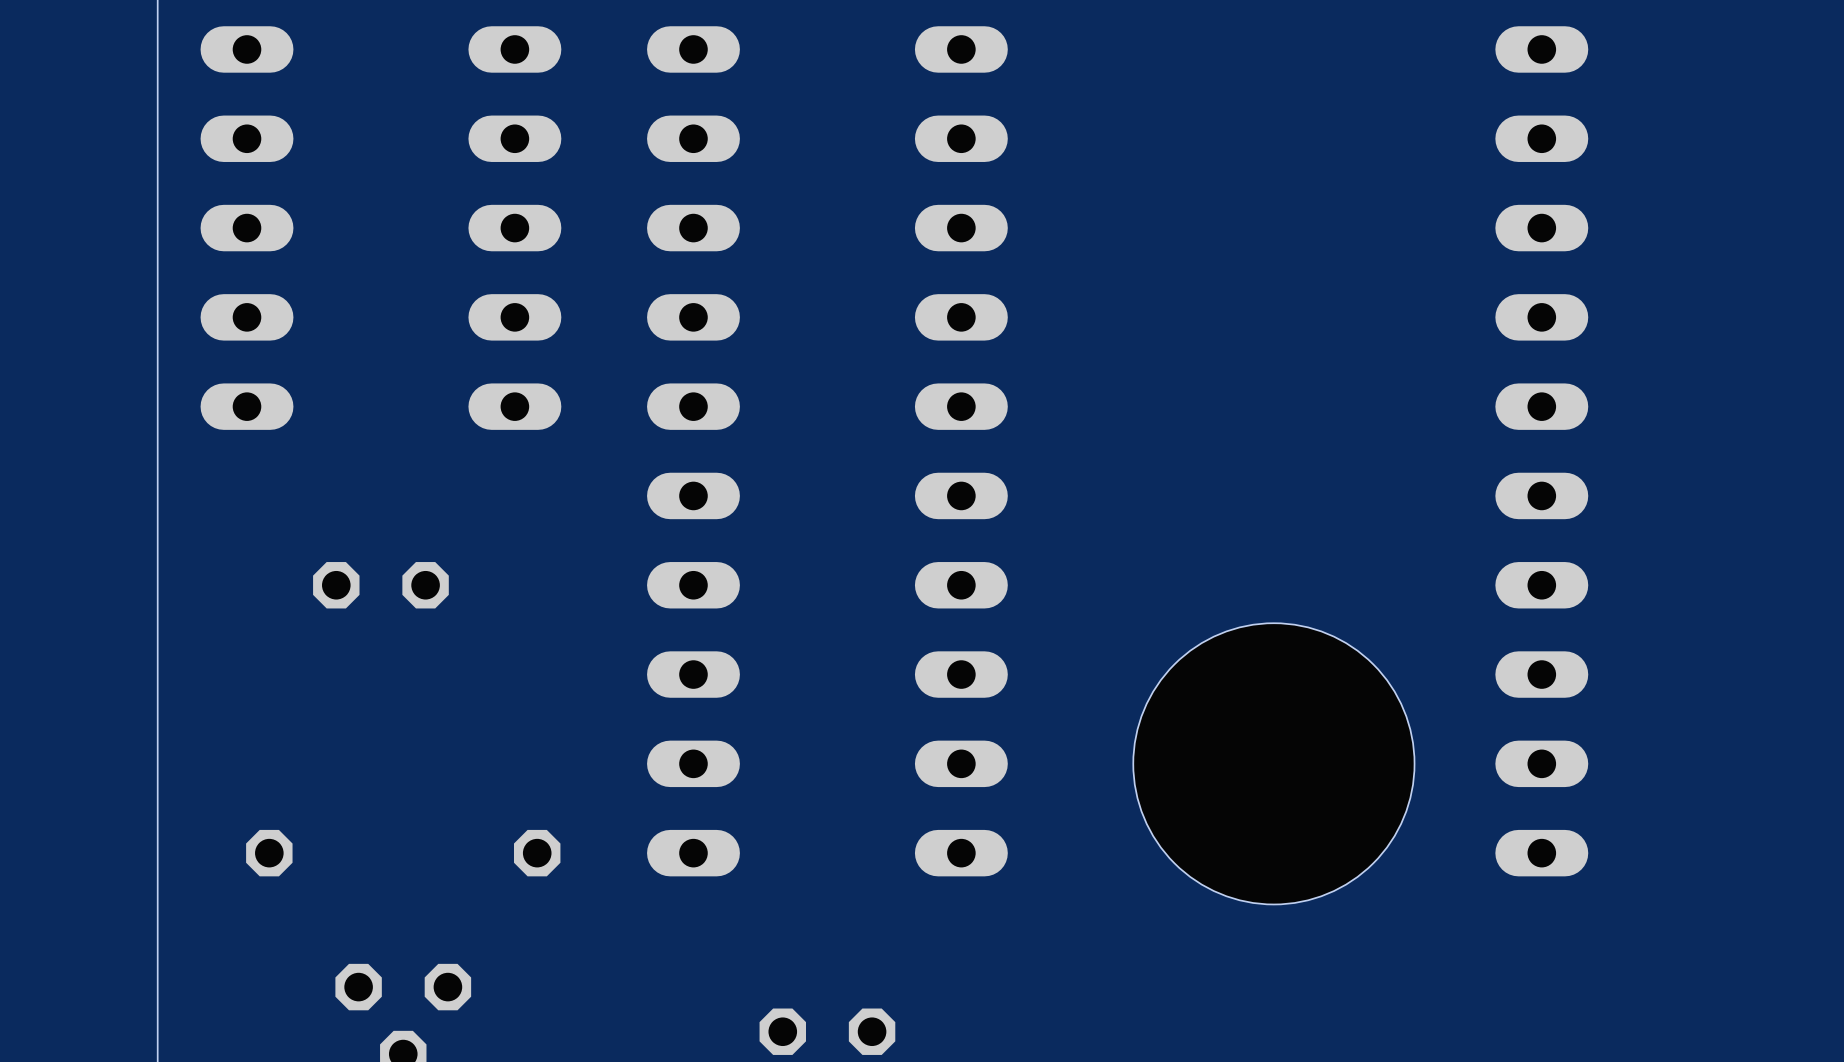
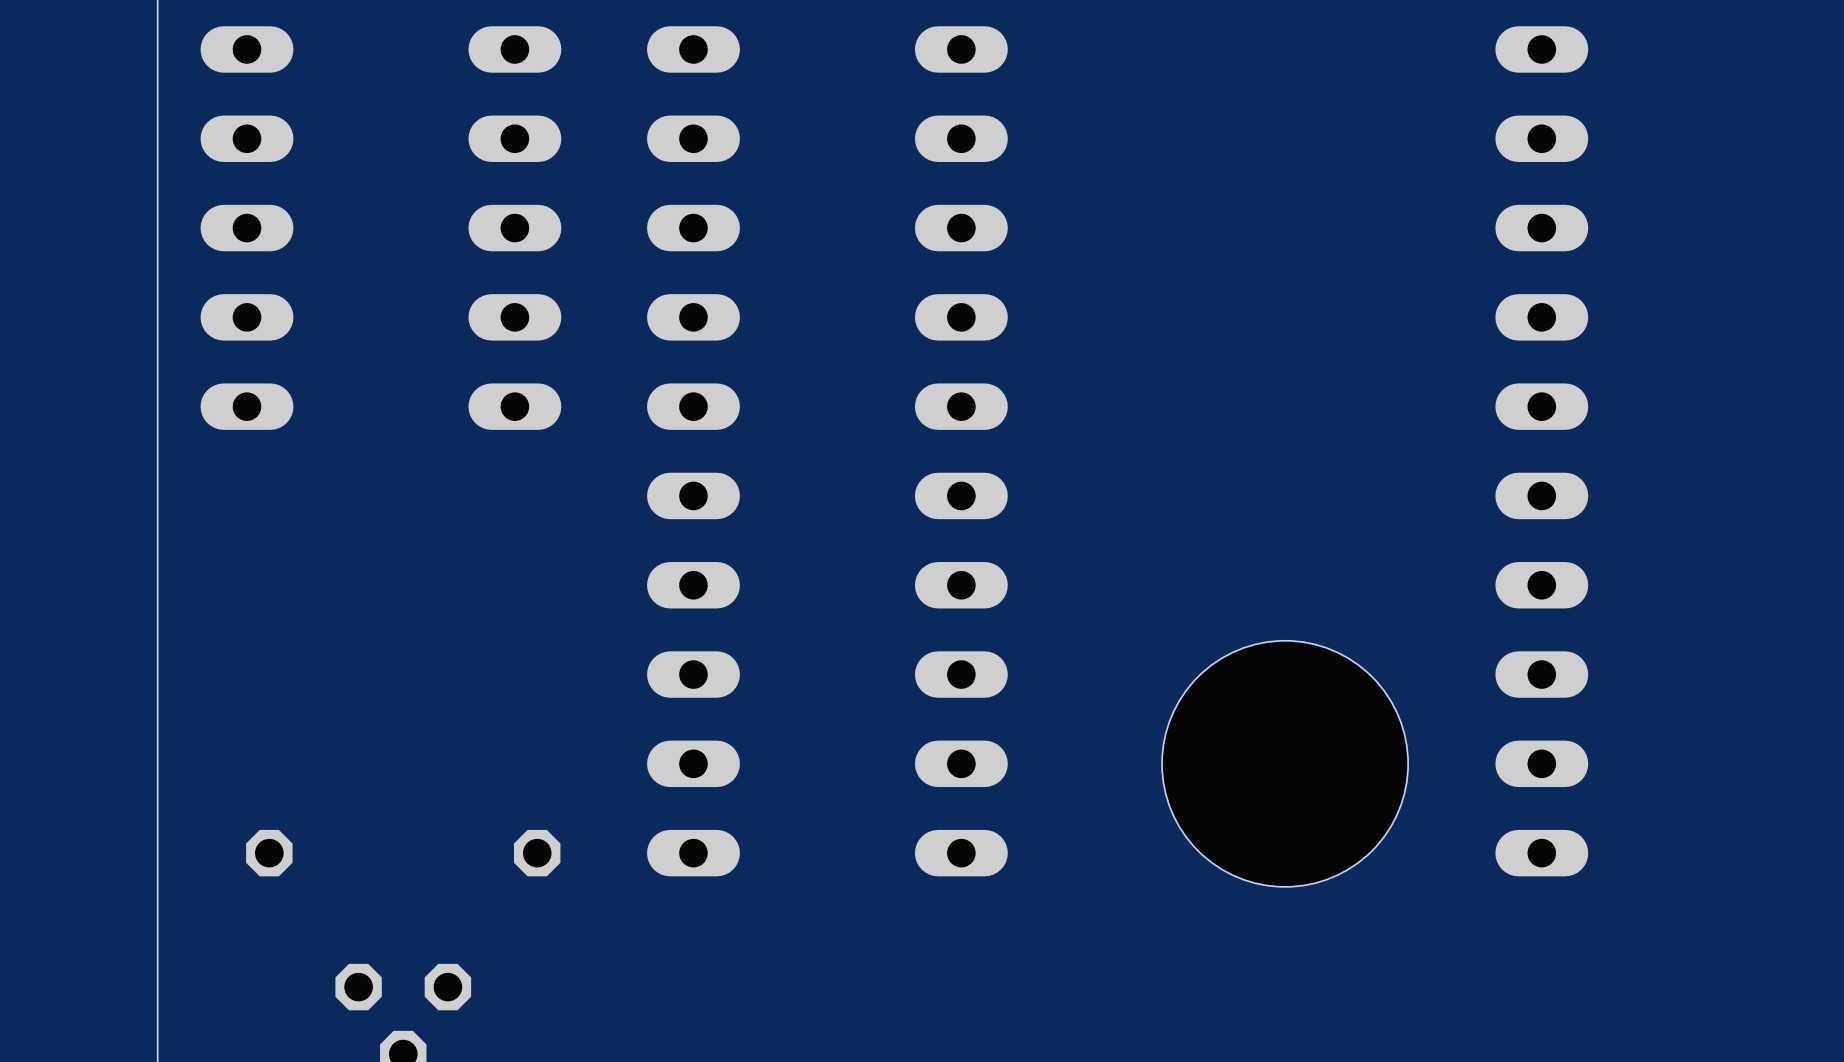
part: (380, 585) -> none
hole size: [1133, 623, 1415, 905] -> [1162, 640, 1409, 887]
part: (827, 1031) -> none

